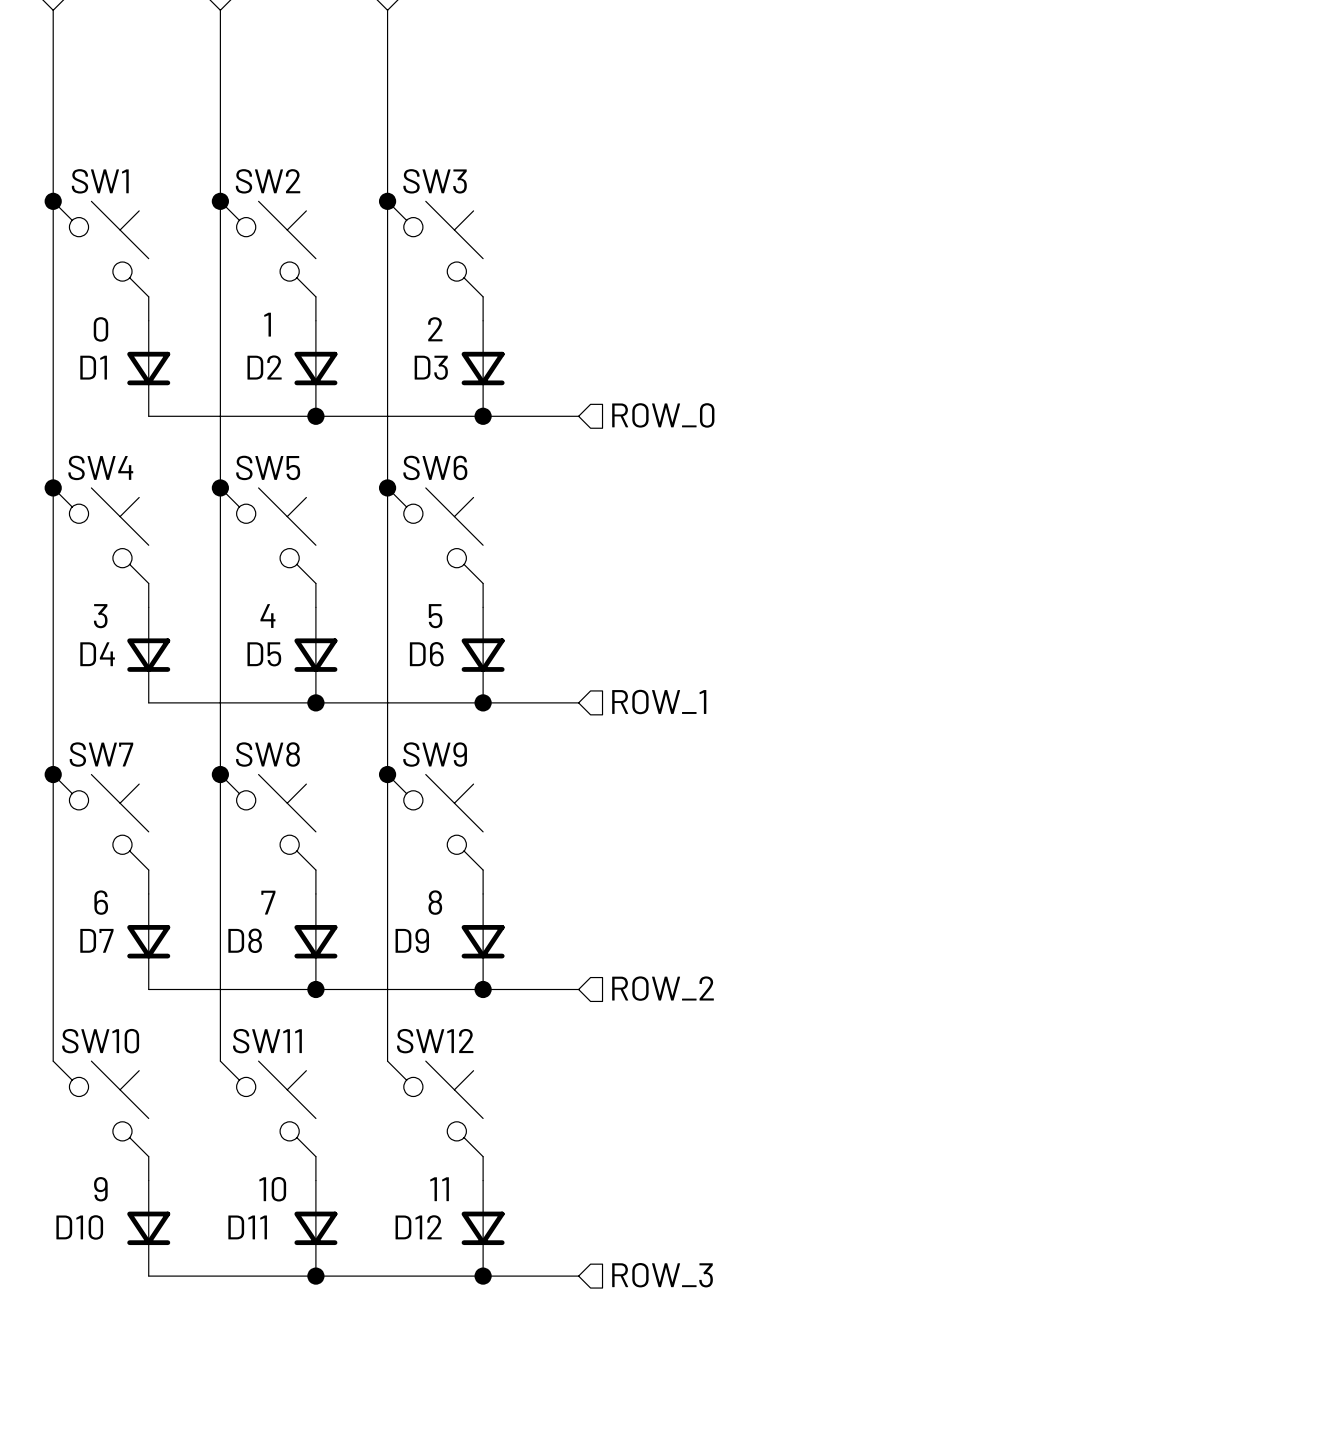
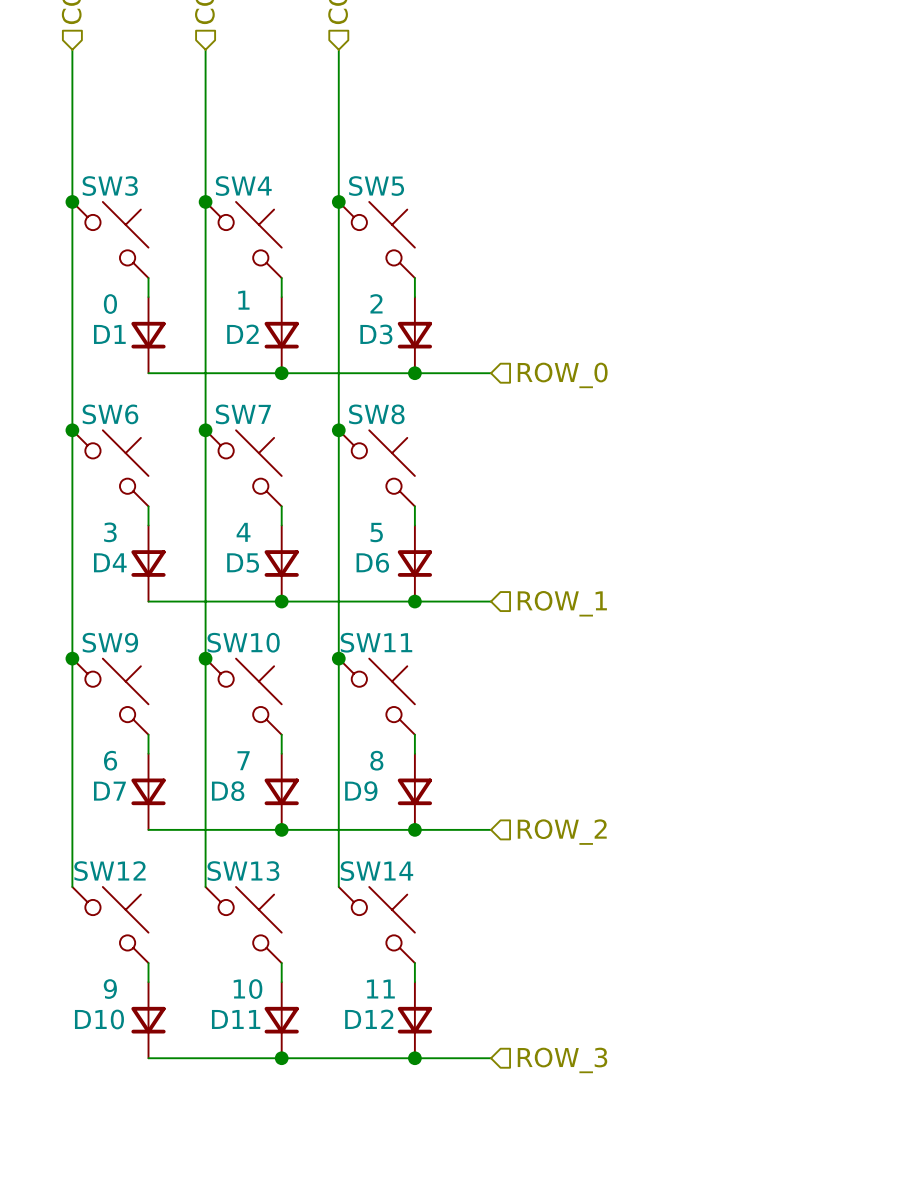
SW1 name: SW1 (100, 181) -> SW3 (110, 186)
SW2 name: SW2 (268, 181) -> SW4 (243, 186)
SW3 name: SW3 (435, 181) -> SW5 (376, 186)
SW4 name: SW4 (100, 467) -> SW6 (110, 414)
SW5 name: SW5 (268, 467) -> SW7 (243, 414)
SW6 name: SW6 (435, 467) -> SW8 (376, 414)
SW7 name: SW7 (101, 754) -> SW9 (110, 642)
SW8 name: SW8 (268, 754) -> SW10 (243, 642)
SW9 name: SW9 (435, 754) -> SW11 (376, 642)
SW10 name: SW10 (100, 1041) -> SW12 (110, 871)
SW11 name: SW11 (267, 1041) -> SW13 (243, 871)
SW12 name: SW12 (435, 1041) -> SW14 (376, 871)

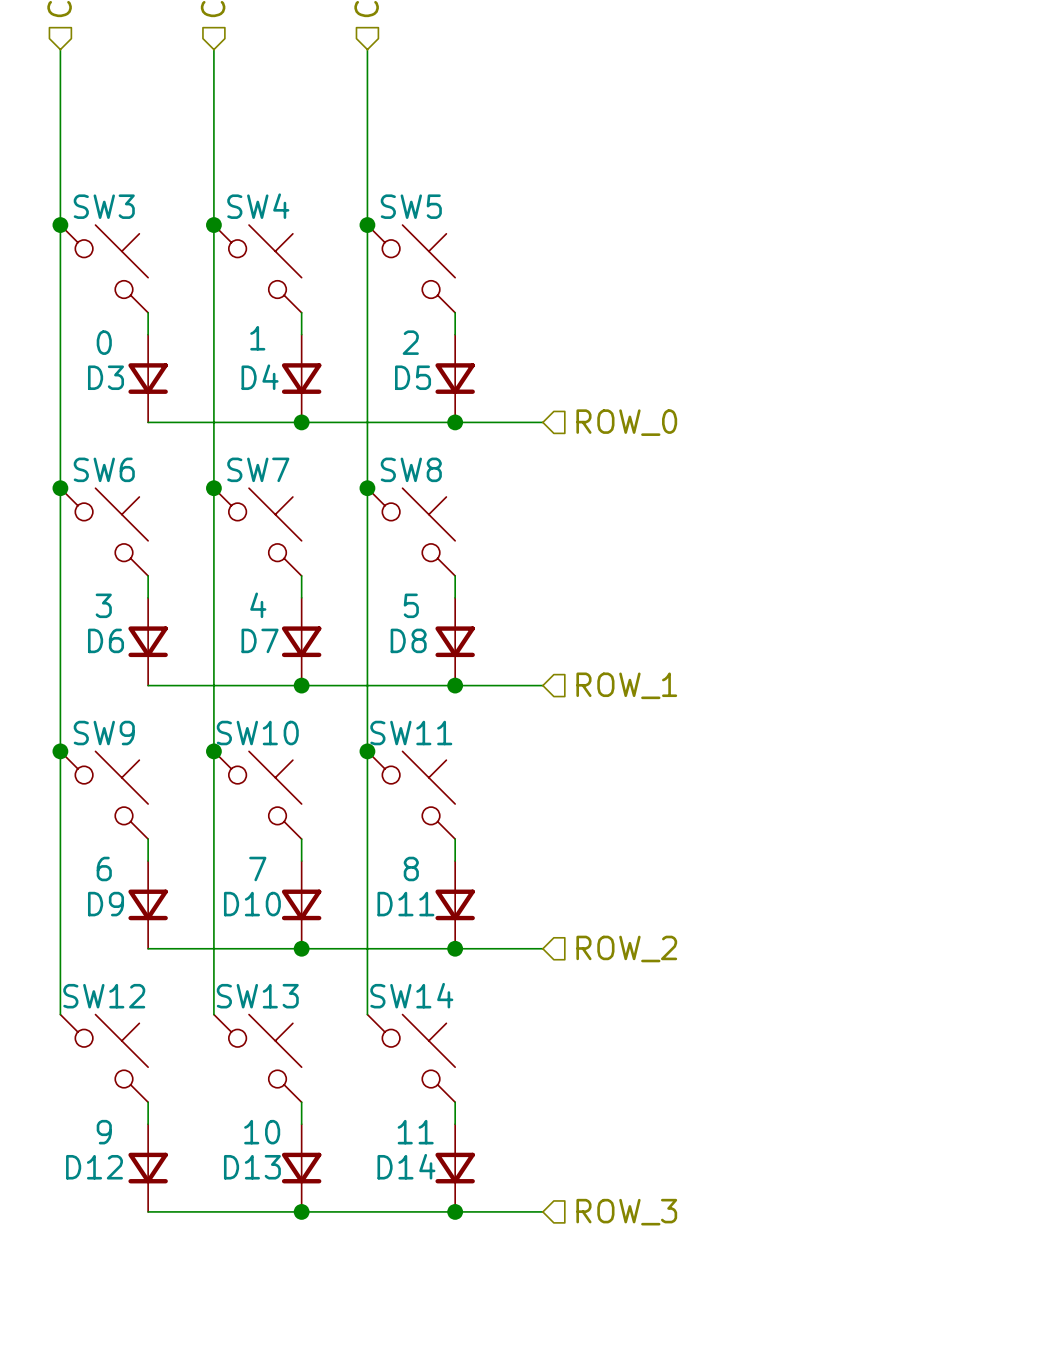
D1 name: D1 (109, 334) -> D3 (106, 377)
D2 name: D2 (242, 334) -> D4 (260, 377)
D3 name: D3 (376, 334) -> D5 (413, 377)
D4 name: D4 (110, 562) -> D6 (106, 640)
D5 name: D5 (243, 562) -> D7 (260, 640)
D6 name: D6 (372, 562) -> D8 (408, 640)
D7 name: D7 (109, 791) -> D9 (106, 904)
D8 name: D8 (228, 791) -> D10 (252, 904)
D9 name: D9 (361, 791) -> D11 (405, 904)
D10 name: D10 (99, 1019) -> D12 (94, 1167)
D11 name: D11 (236, 1019) -> D13 (252, 1167)
D12 name: D12 (369, 1019) -> D14 (406, 1166)

